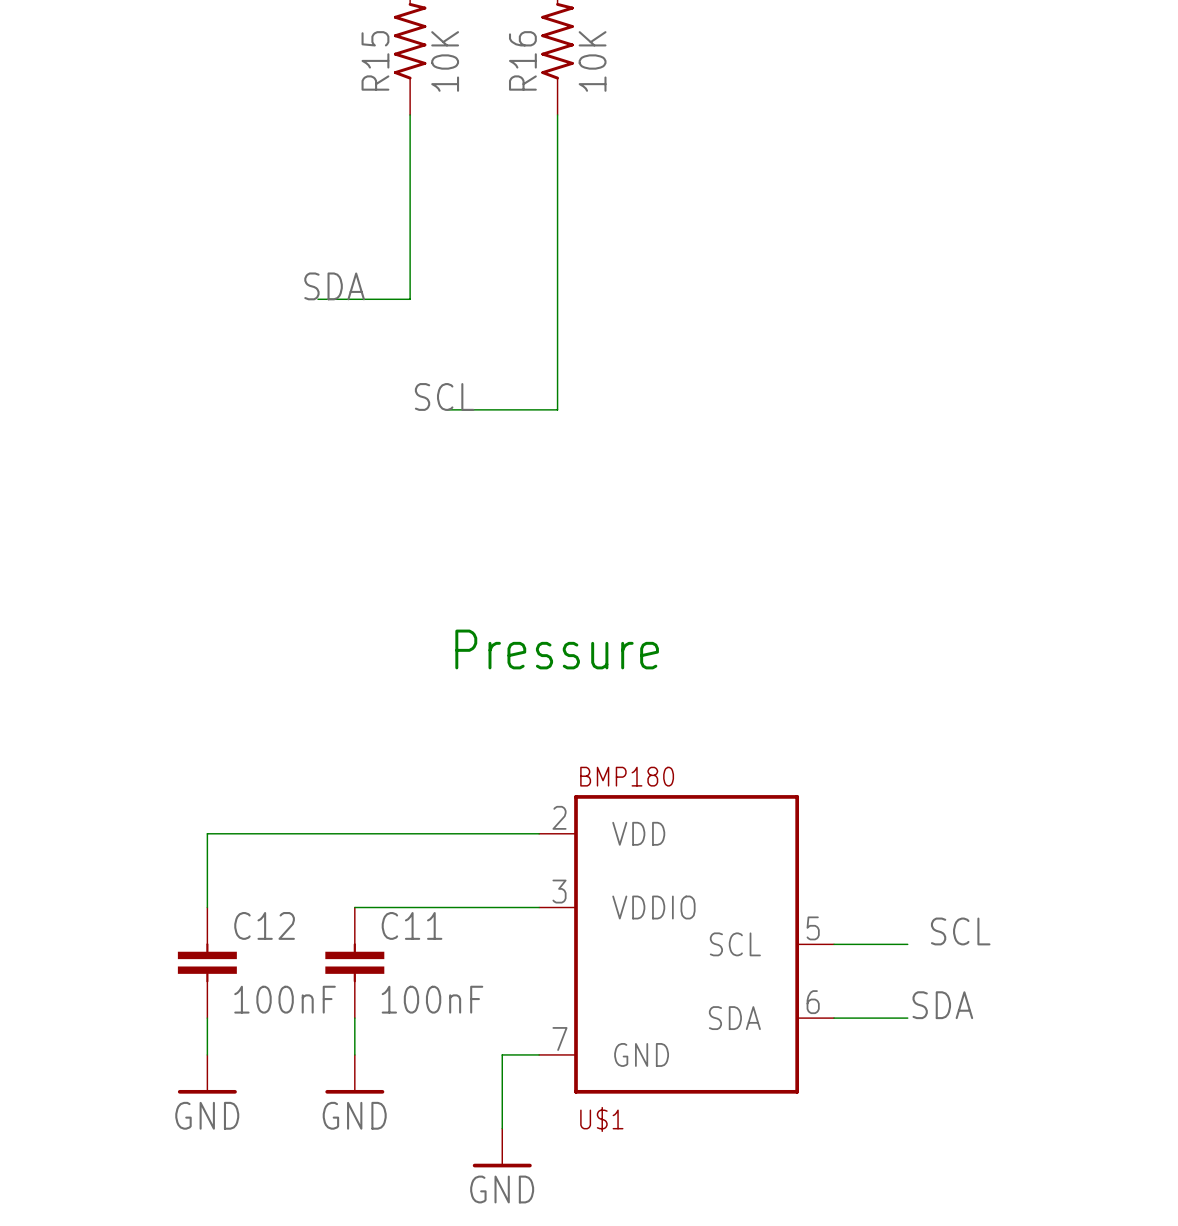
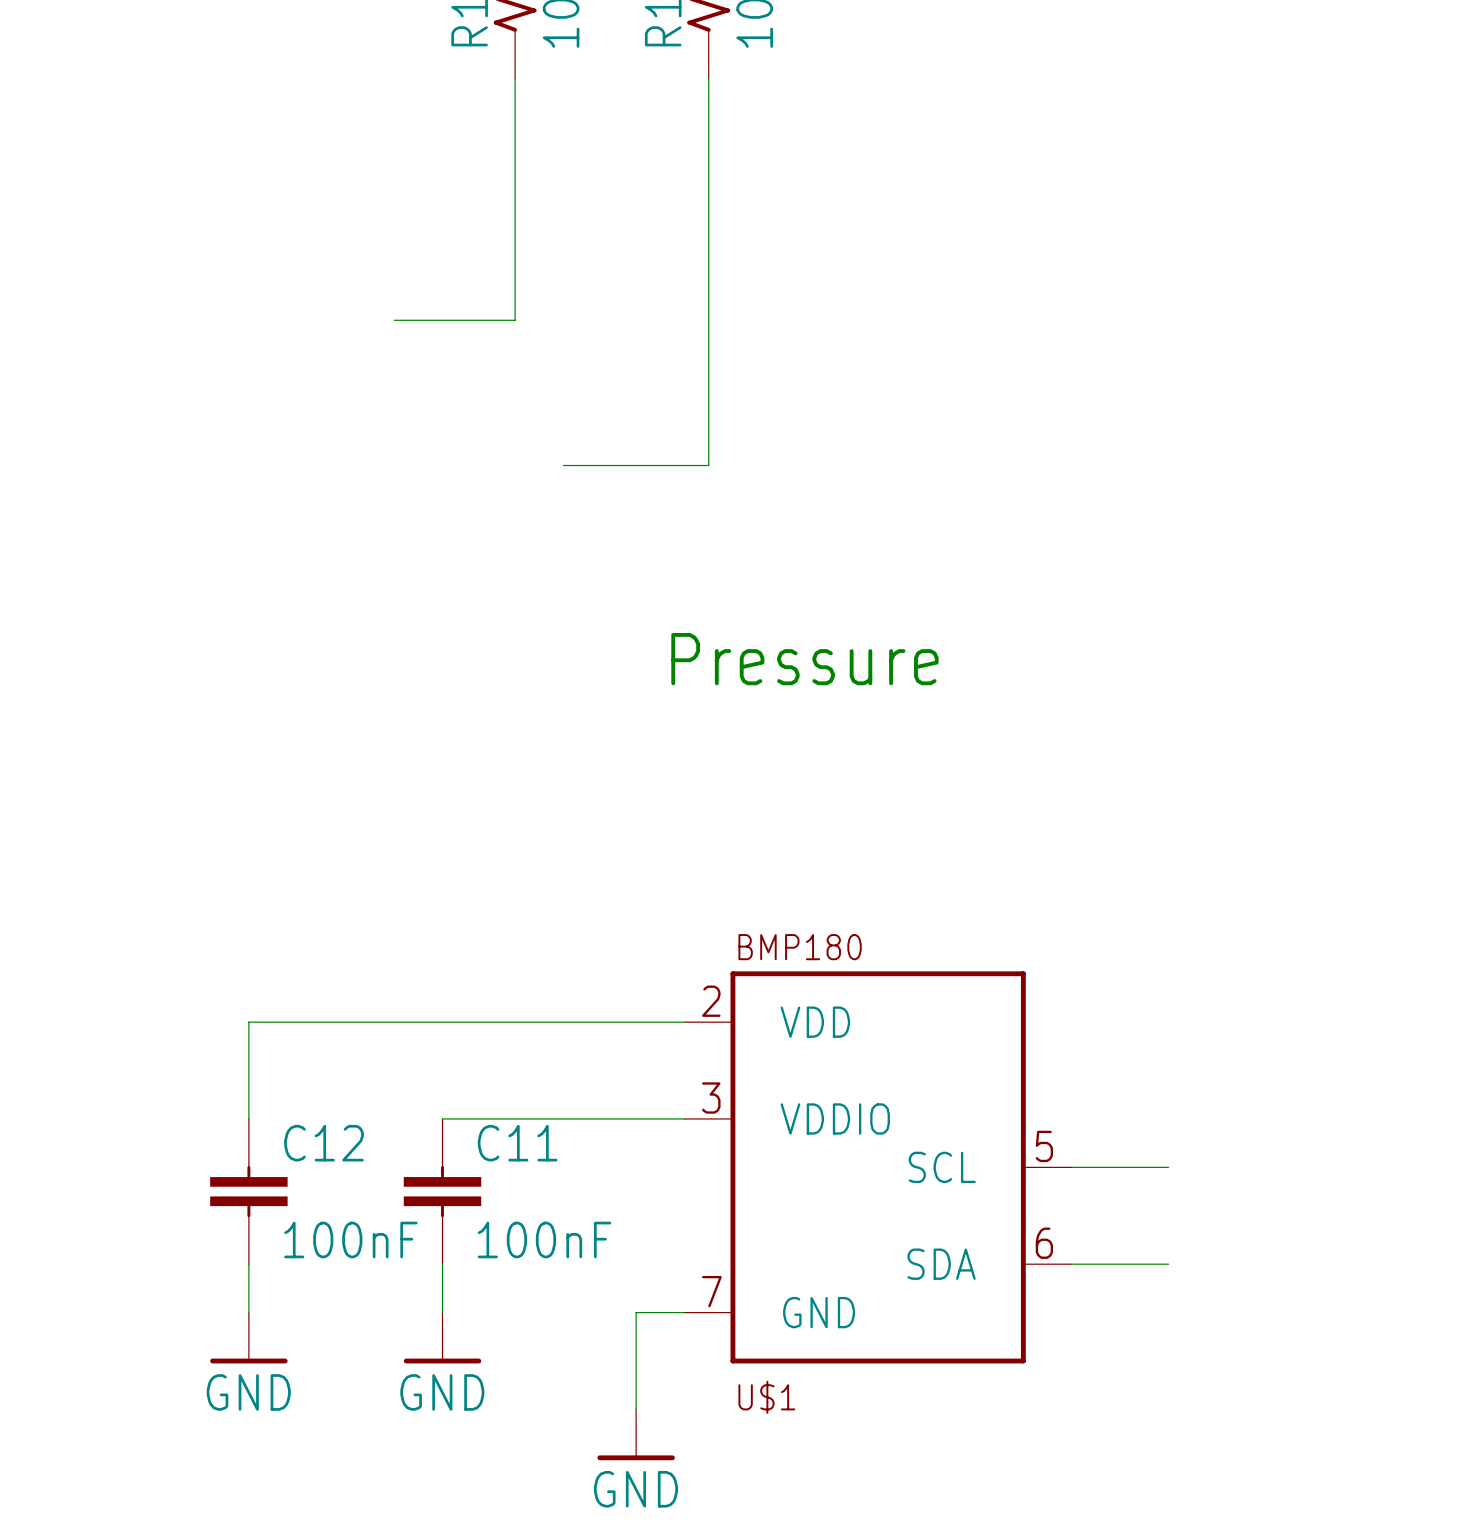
label: SDA (334, 286) -> none
label: SCL (444, 396) -> none
text position: Pressure (557, 649) -> Pressure (804, 659)
label: SCL (960, 931) -> none
label: SDA (942, 1005) -> none

